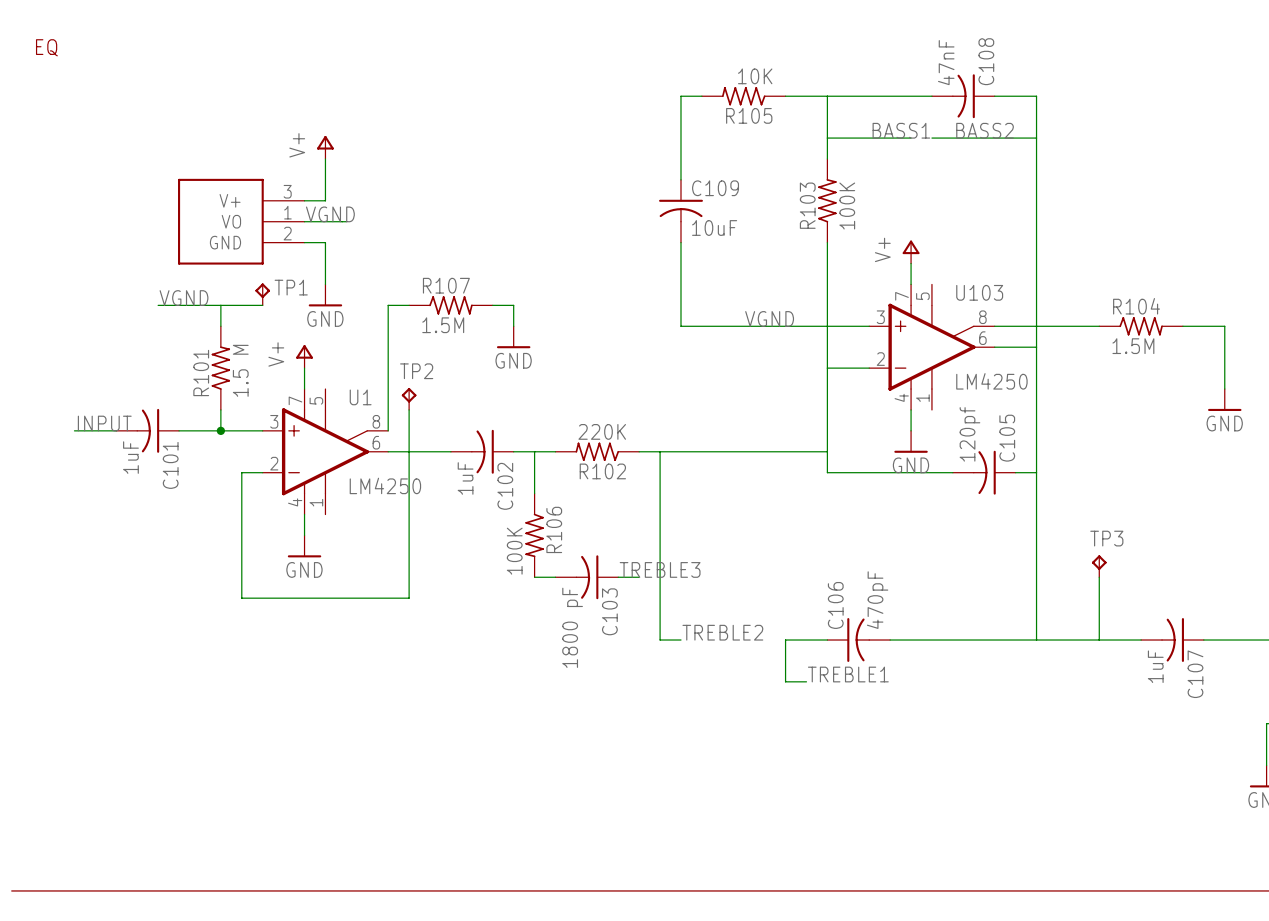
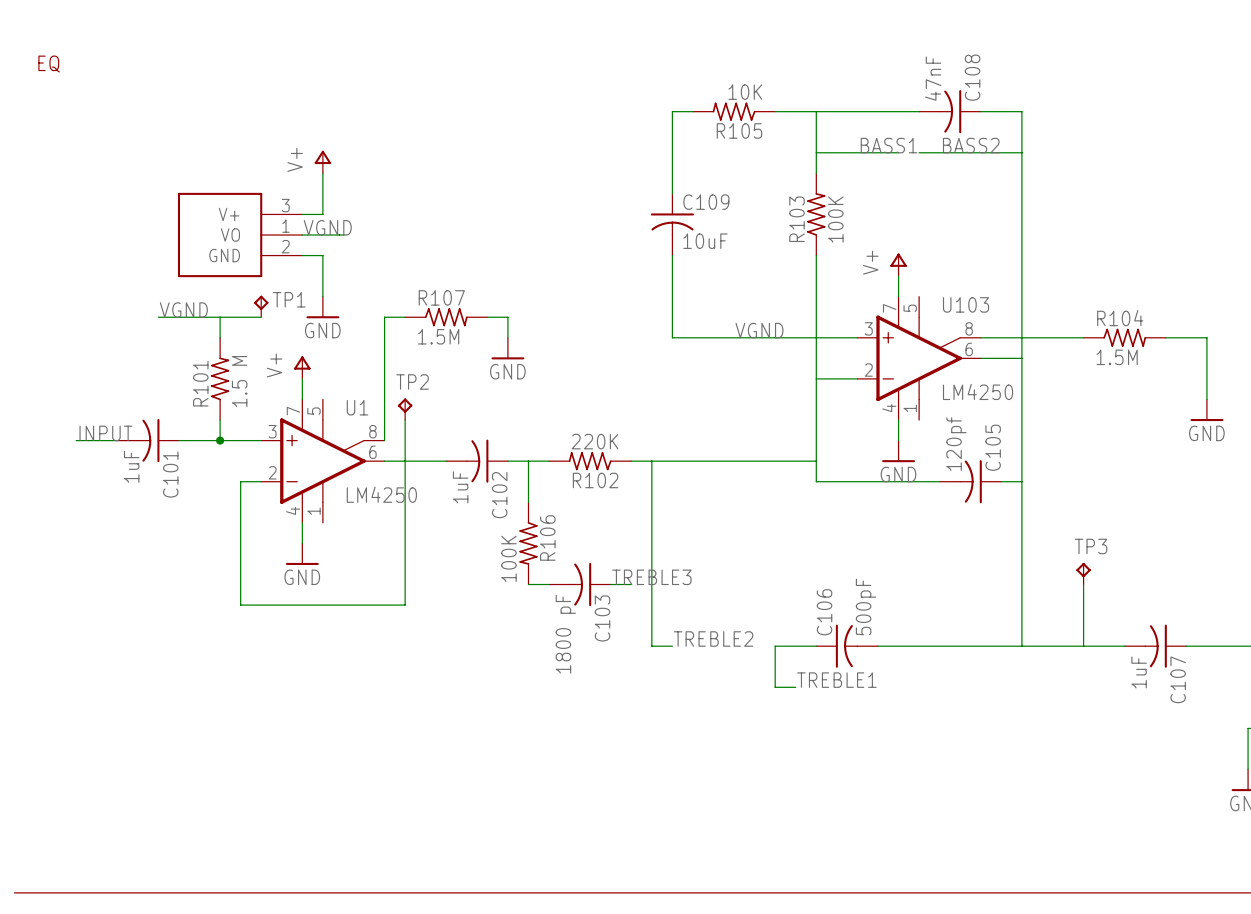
C106 value: 470pF (877, 600) -> 500pF (866, 606)

